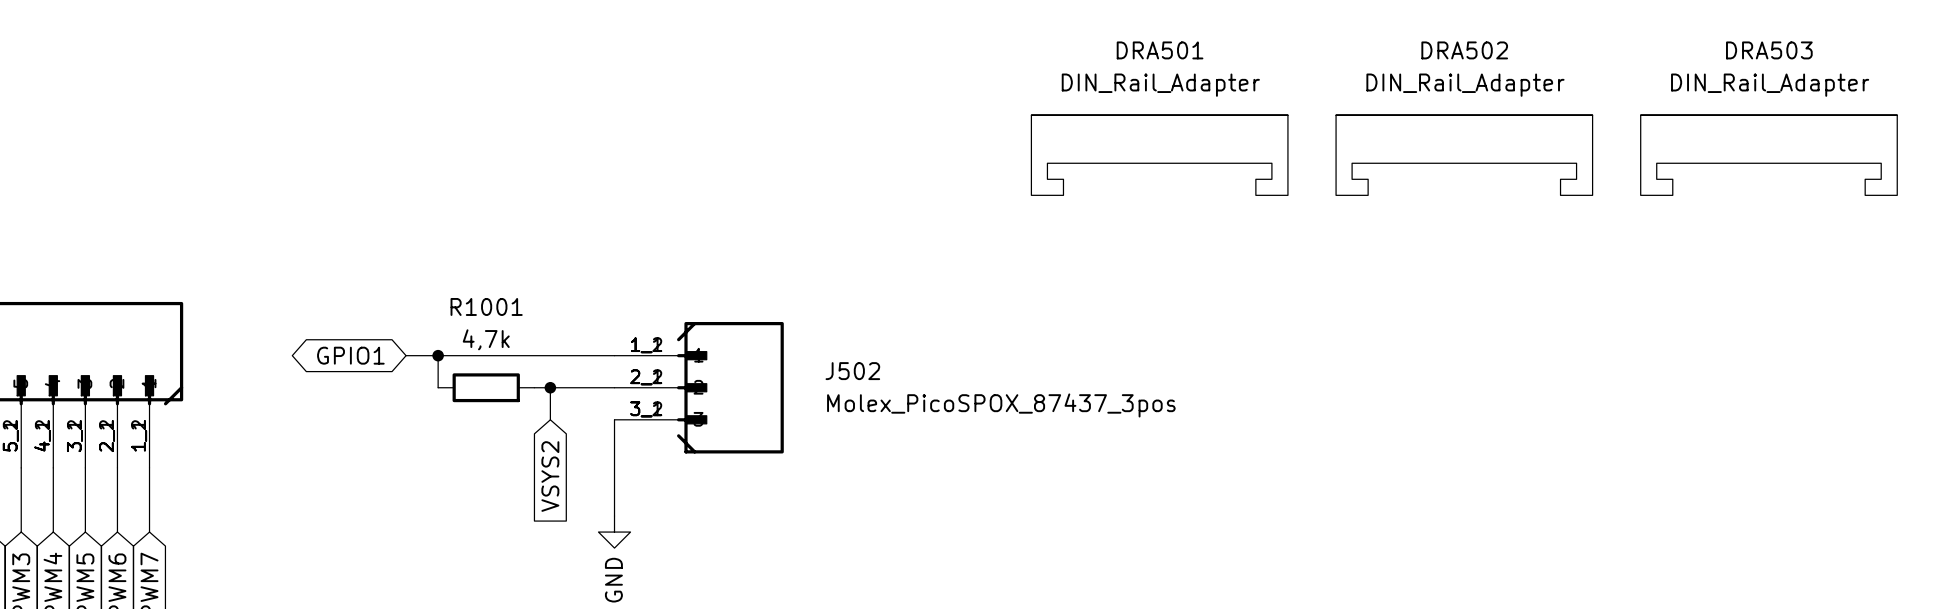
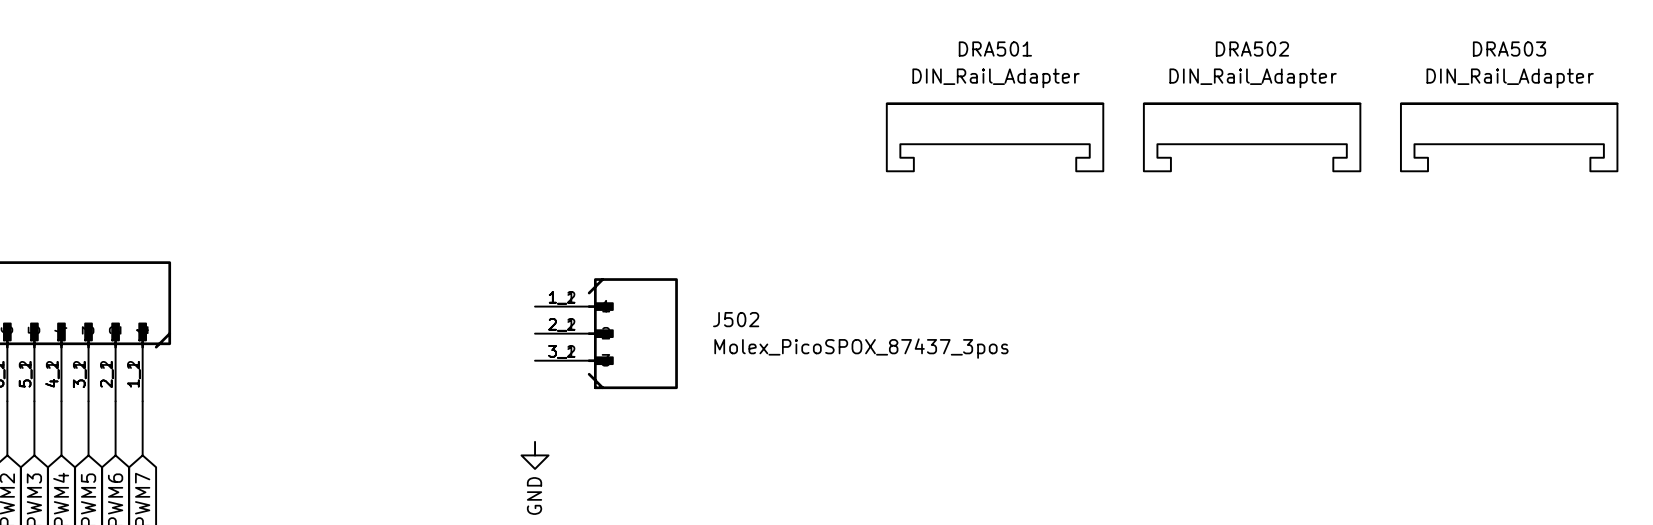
global label: GPIO1 (350, 355) -> none
wire: (406, 355) (614, 355) -> none
wire: (438, 355) (438, 387) -> none
junction: (438, 355) -> none
R1001: 4,7k (486, 387) -> none
wire: (534, 387) (614, 387) -> none
wire: (550, 387) (550, 419) -> none
junction: (550, 387) -> none
wire: (614, 419) (614, 516) -> none
global label: VSYS2 (550, 476) -> none

